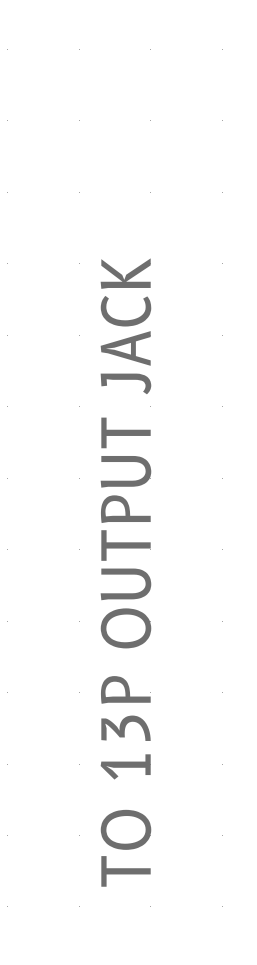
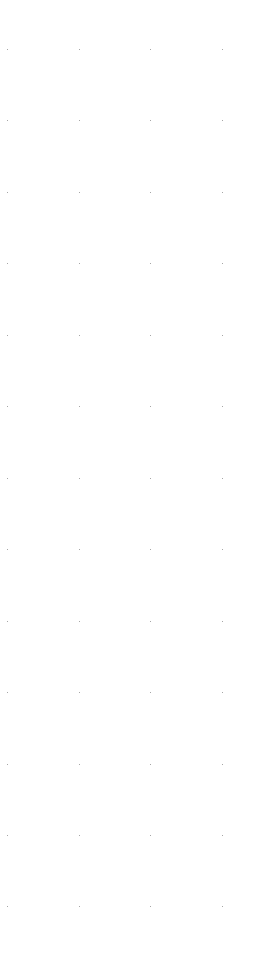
text: TO 13P OUTPUT JACK (125, 572) -> none

